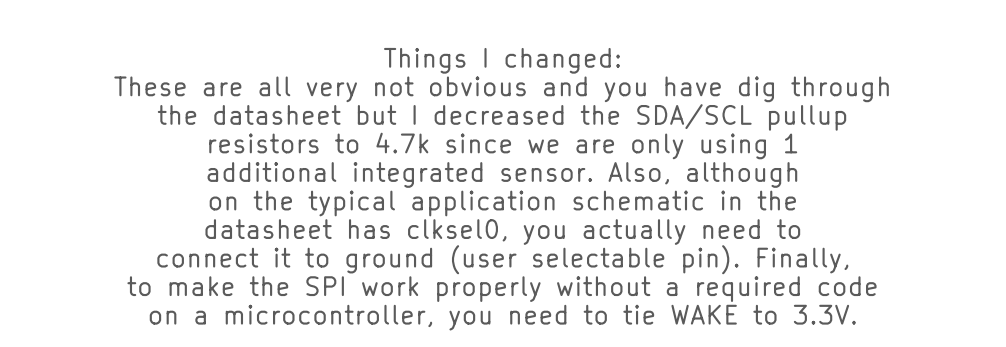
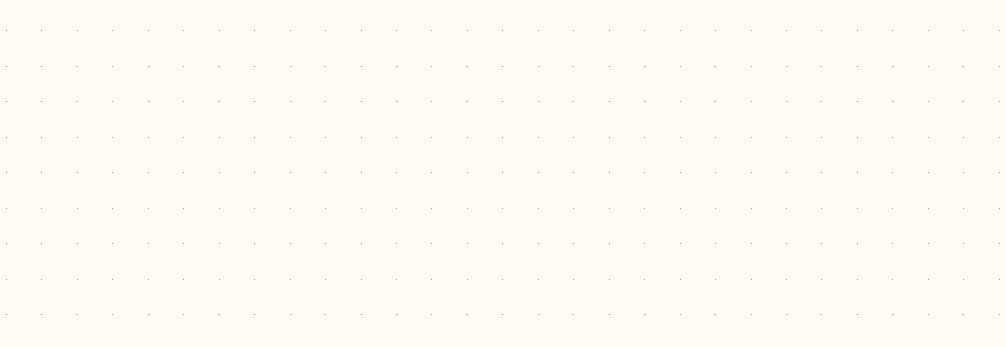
text: Things I changed: (501, 60) -> none
text: These are all very not obvious and you have dig through (501, 89) -> none
text: the datasheet but I decreased the SDA/SCL pullup (501, 117) -> none
text: resistors to 4.7k since we are only using 1 (503, 145) -> none
text: additional integrated sensor. Also, although (502, 174) -> none
text: on the typical application schematic in the (502, 203) -> none
text: datasheet has clksel0, you actually need to (502, 232) -> none
text: connect it to ground (user selectable pin). Finally, (502, 259) -> none
text: to make the SPI work properly without a required code (501, 289) -> none
text: on a microcontroller, you need to tie WAKE to 3.3V. (502, 317) -> none

